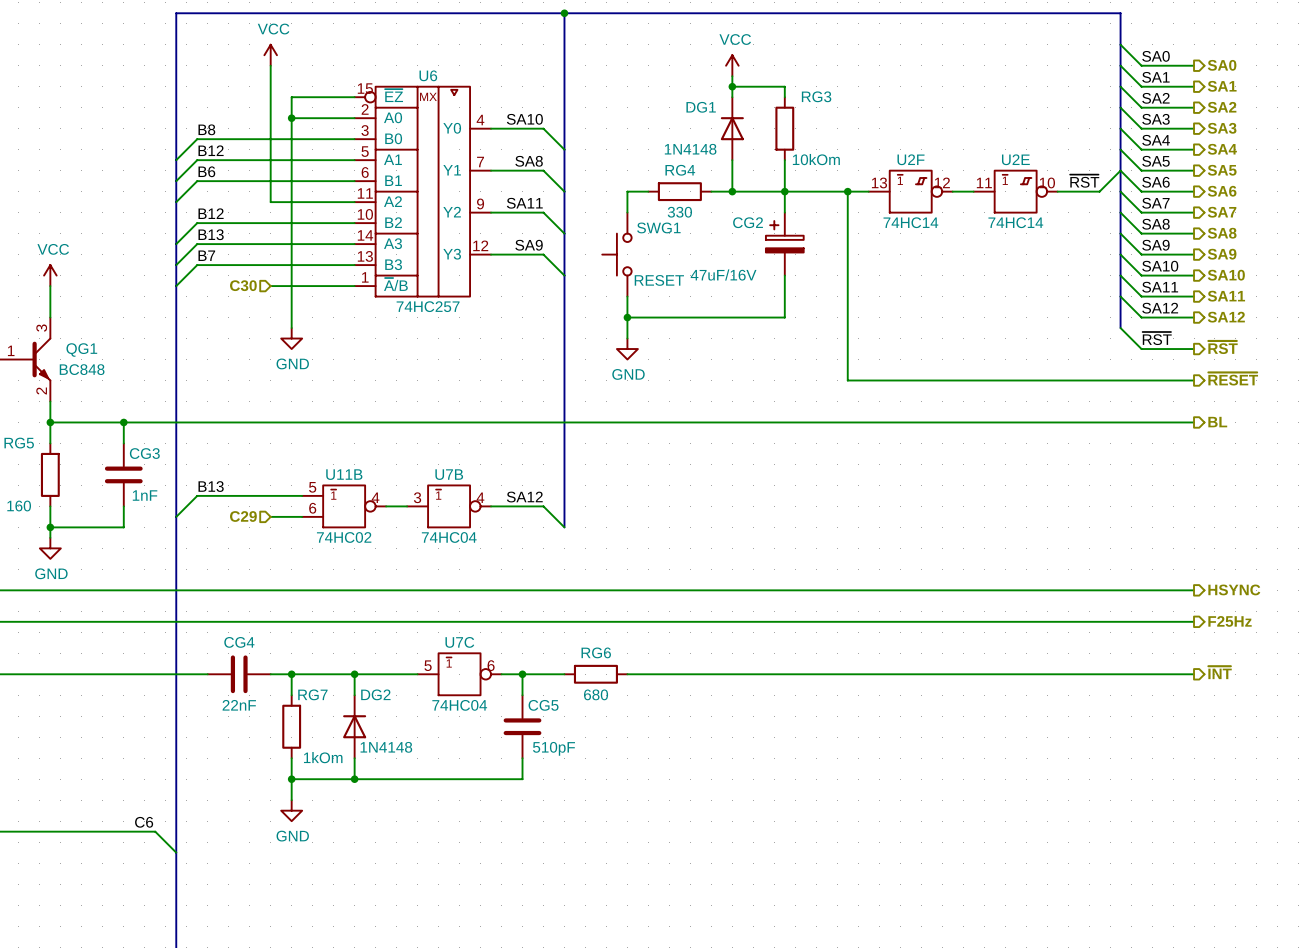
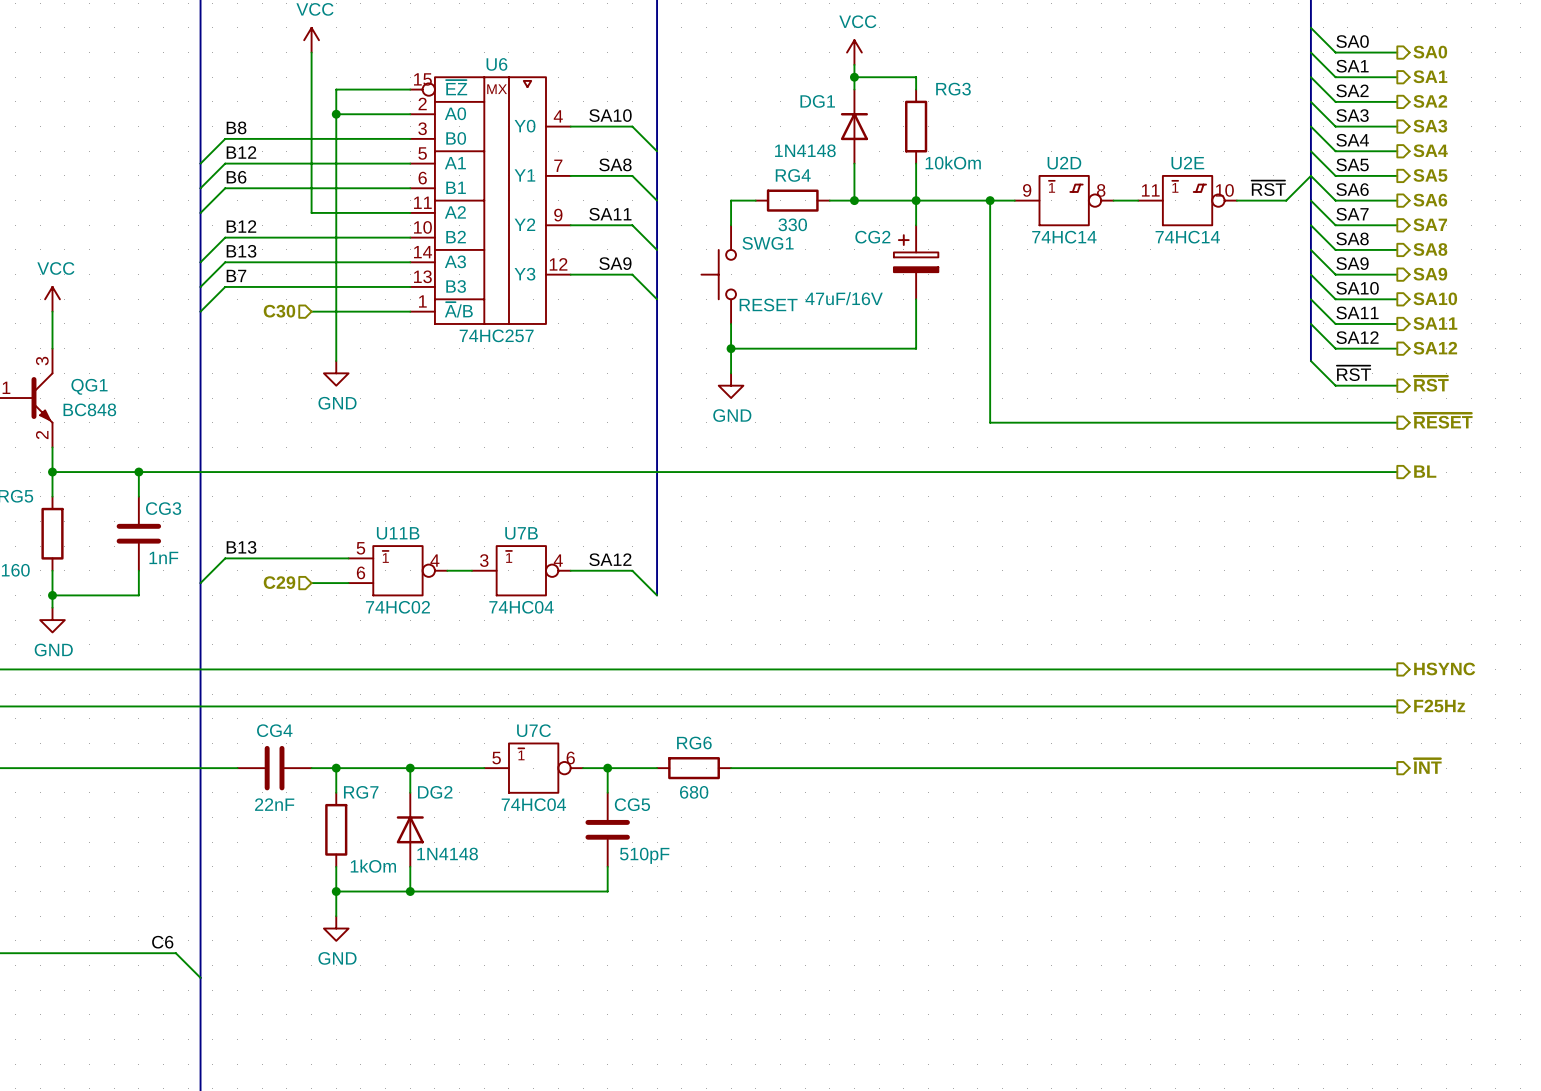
U2F name: U2F (911, 159) -> U2D (1064, 163)
U2F pin number: 13 (879, 182) -> 9 (1027, 190)
U2F pin number: 12 (942, 182) -> 8 (1101, 190)

